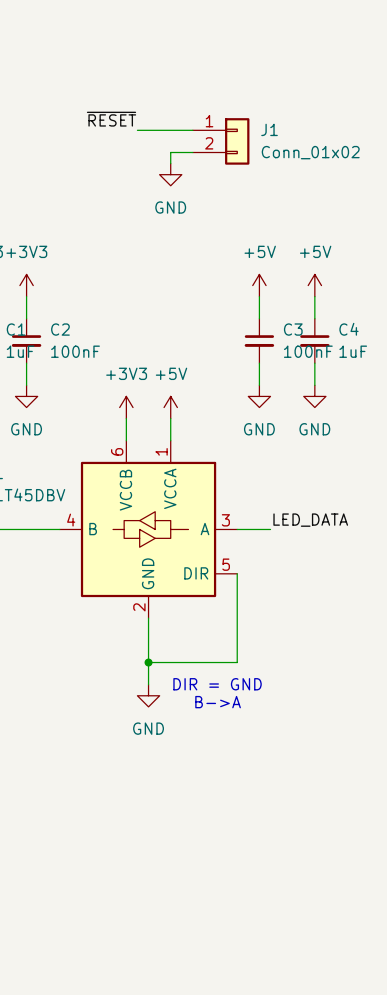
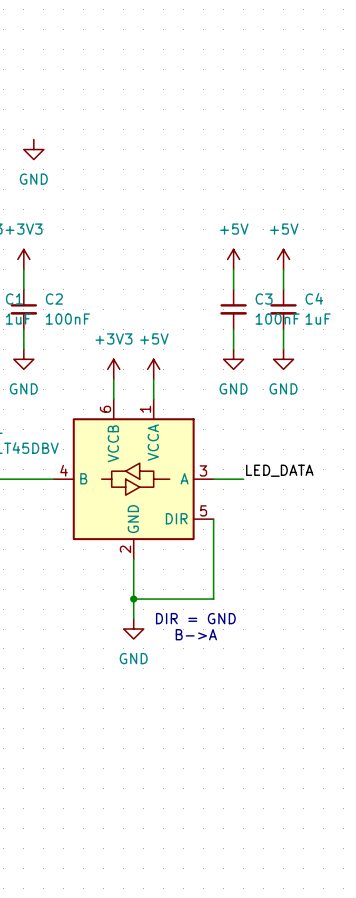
label: ~{RESET} (111, 119) -> none
wire: (137, 130) (192, 130) -> none
J1: Conn_01x02 (221, 141) -> none
wire: (192, 152) (170, 152) (170, 163) -> none
power symbol: none -> GND (33, 149)
power symbol: GND (170, 174) -> none

